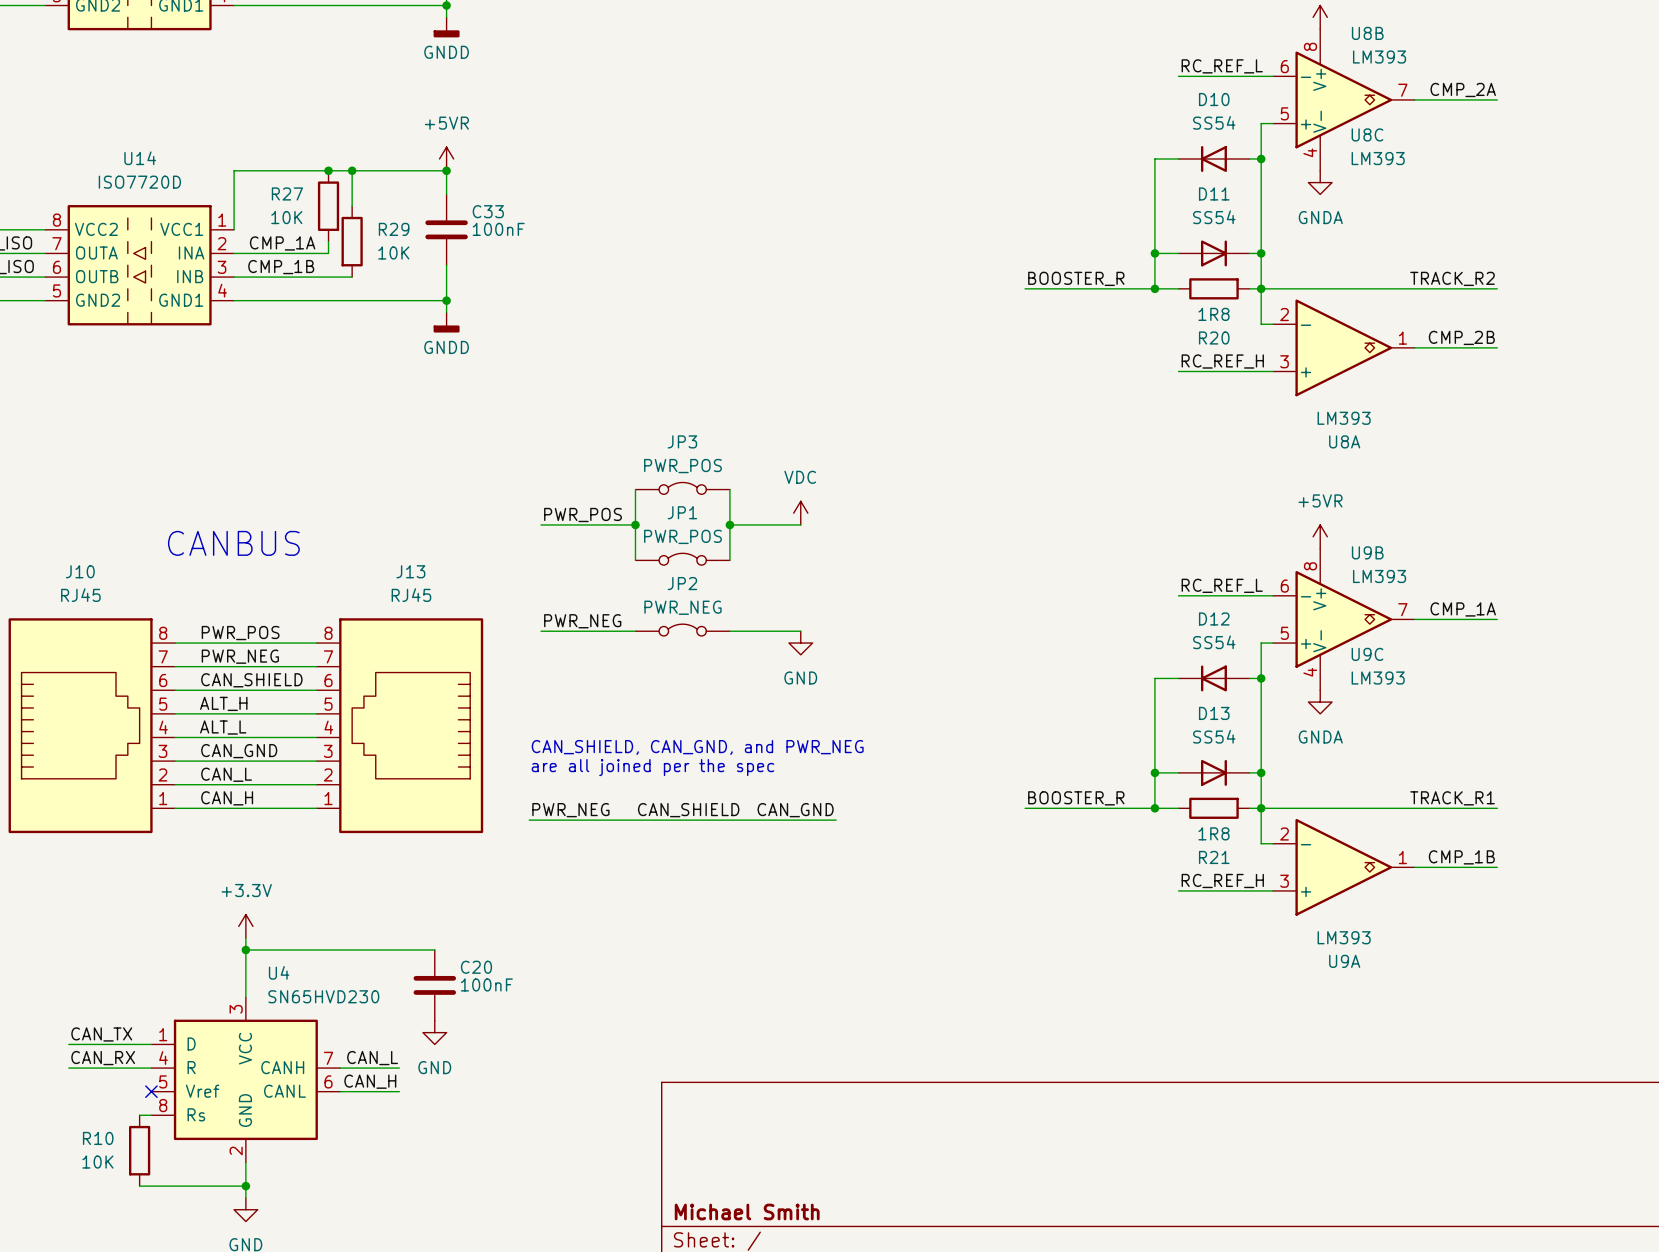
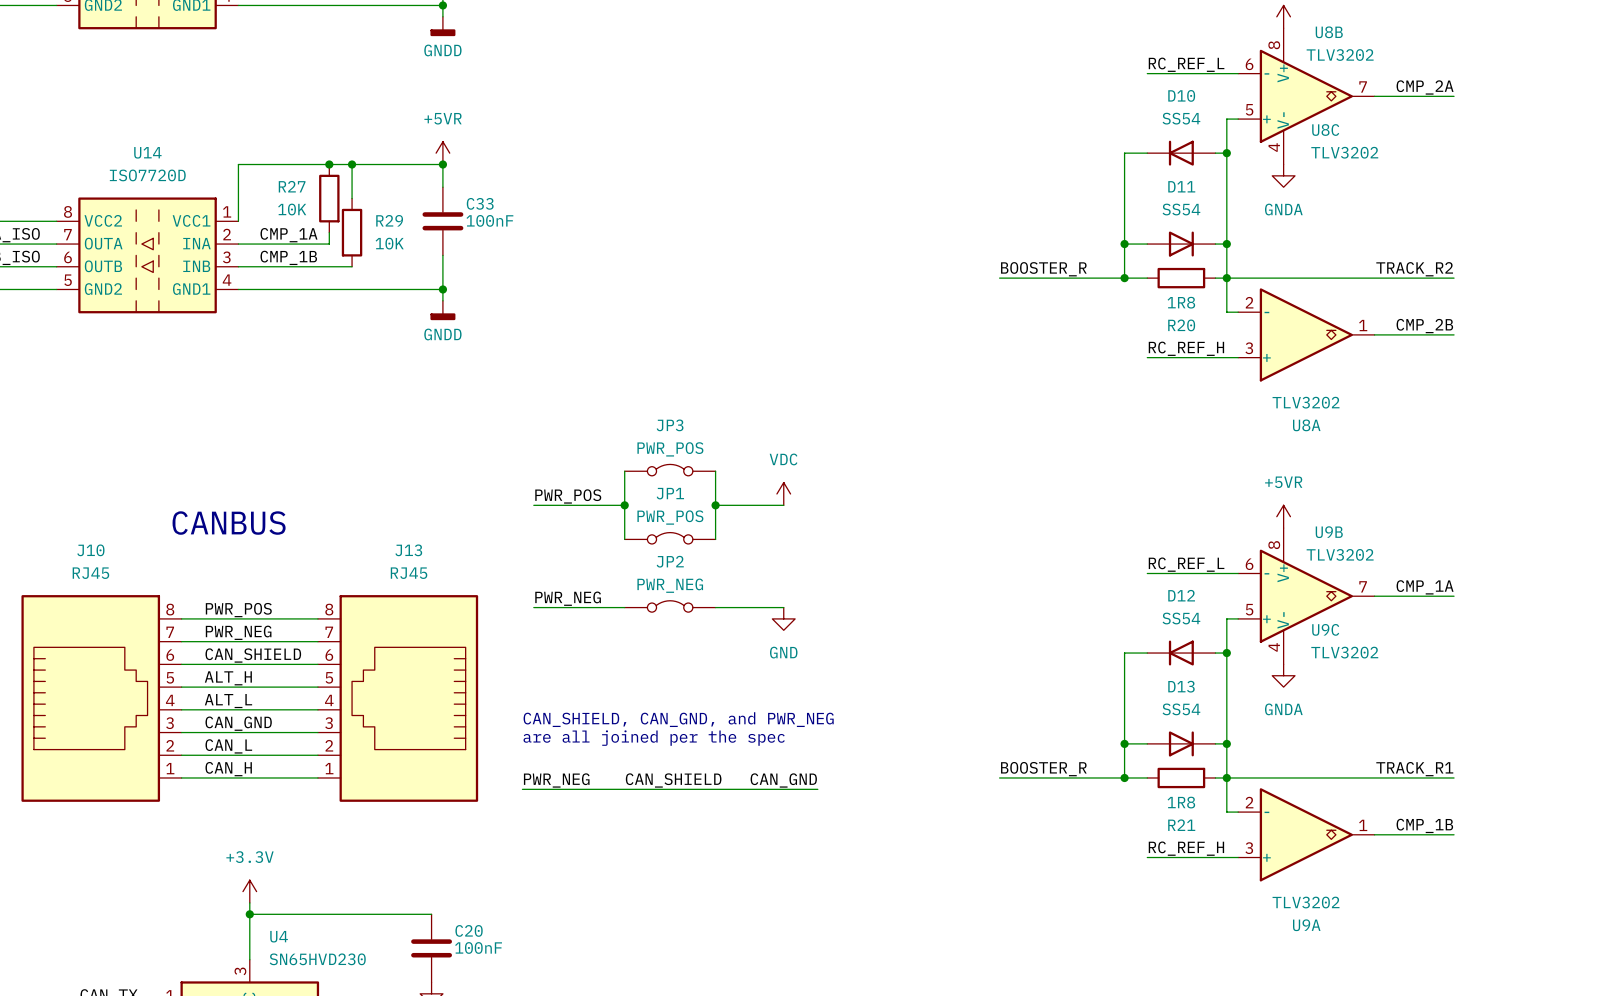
U8B value: LM393 (1379, 57) -> TLV3202 (1340, 55)
U8C value: LM393 (1378, 158) -> TLV3202 (1344, 152)
U8A value: LM393 (1344, 418) -> TLV3202 (1306, 402)
U9B value: LM393 (1379, 576) -> TLV3202 (1340, 554)
U9C value: LM393 (1378, 678) -> TLV3202 (1344, 652)
U9A value: LM393 (1344, 937) -> TLV3202 (1306, 902)

